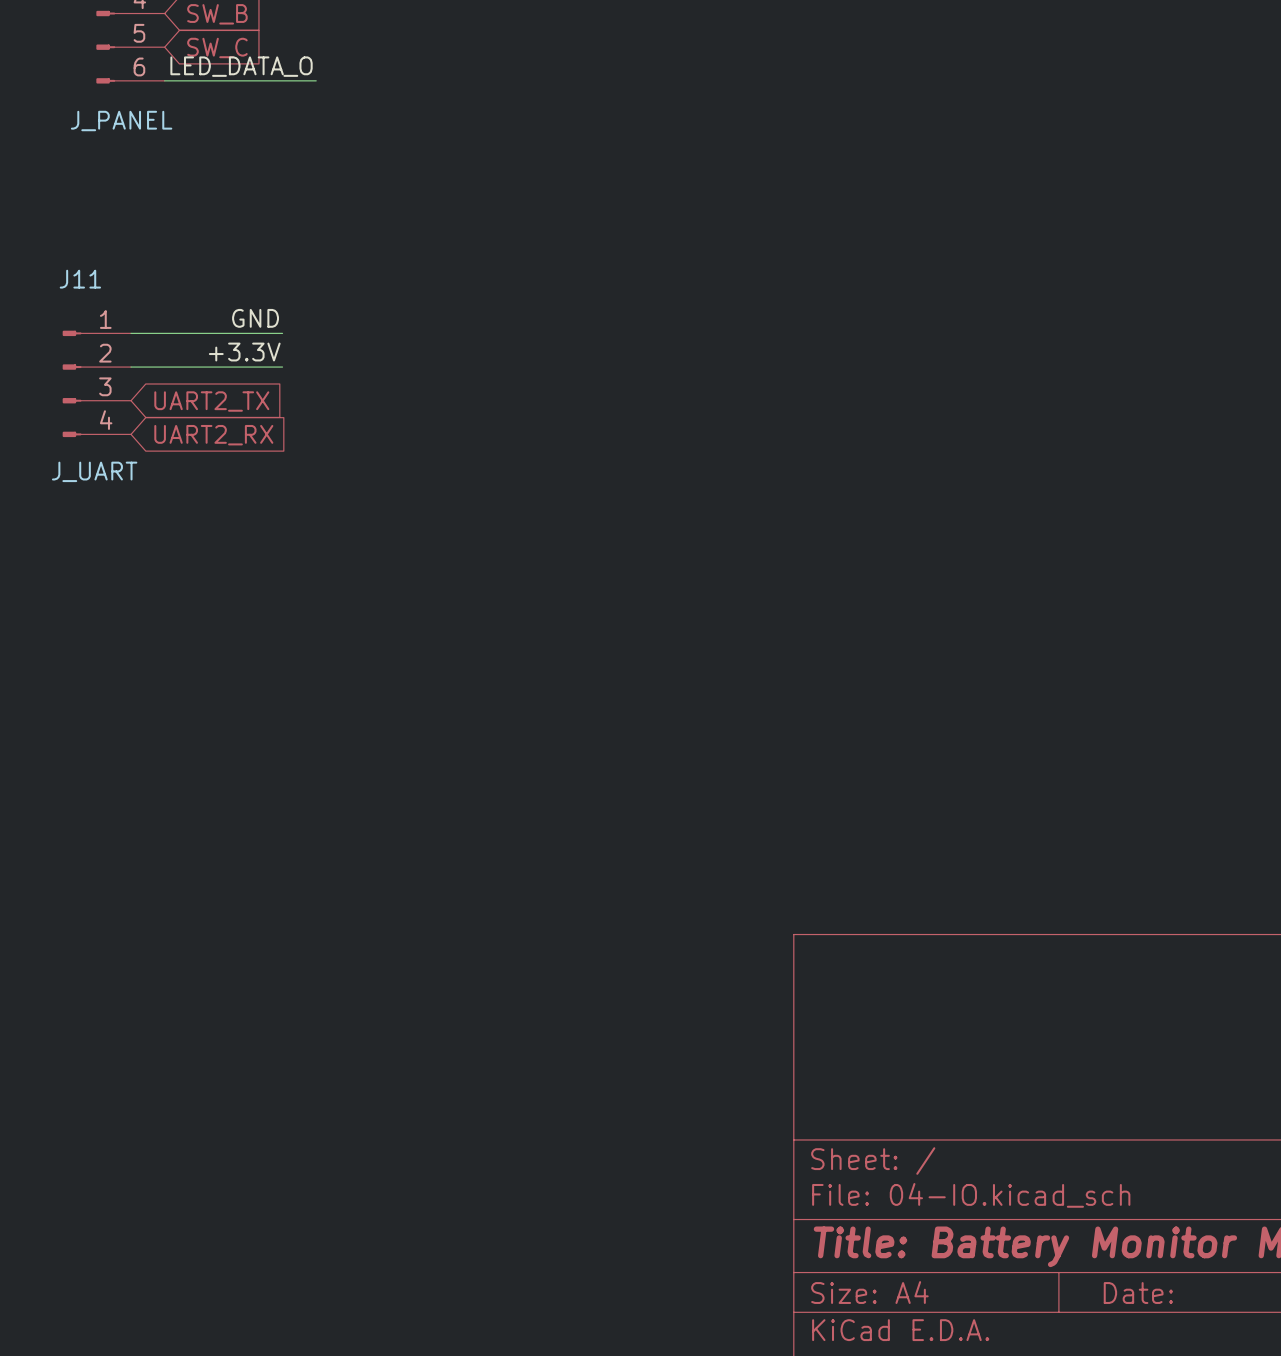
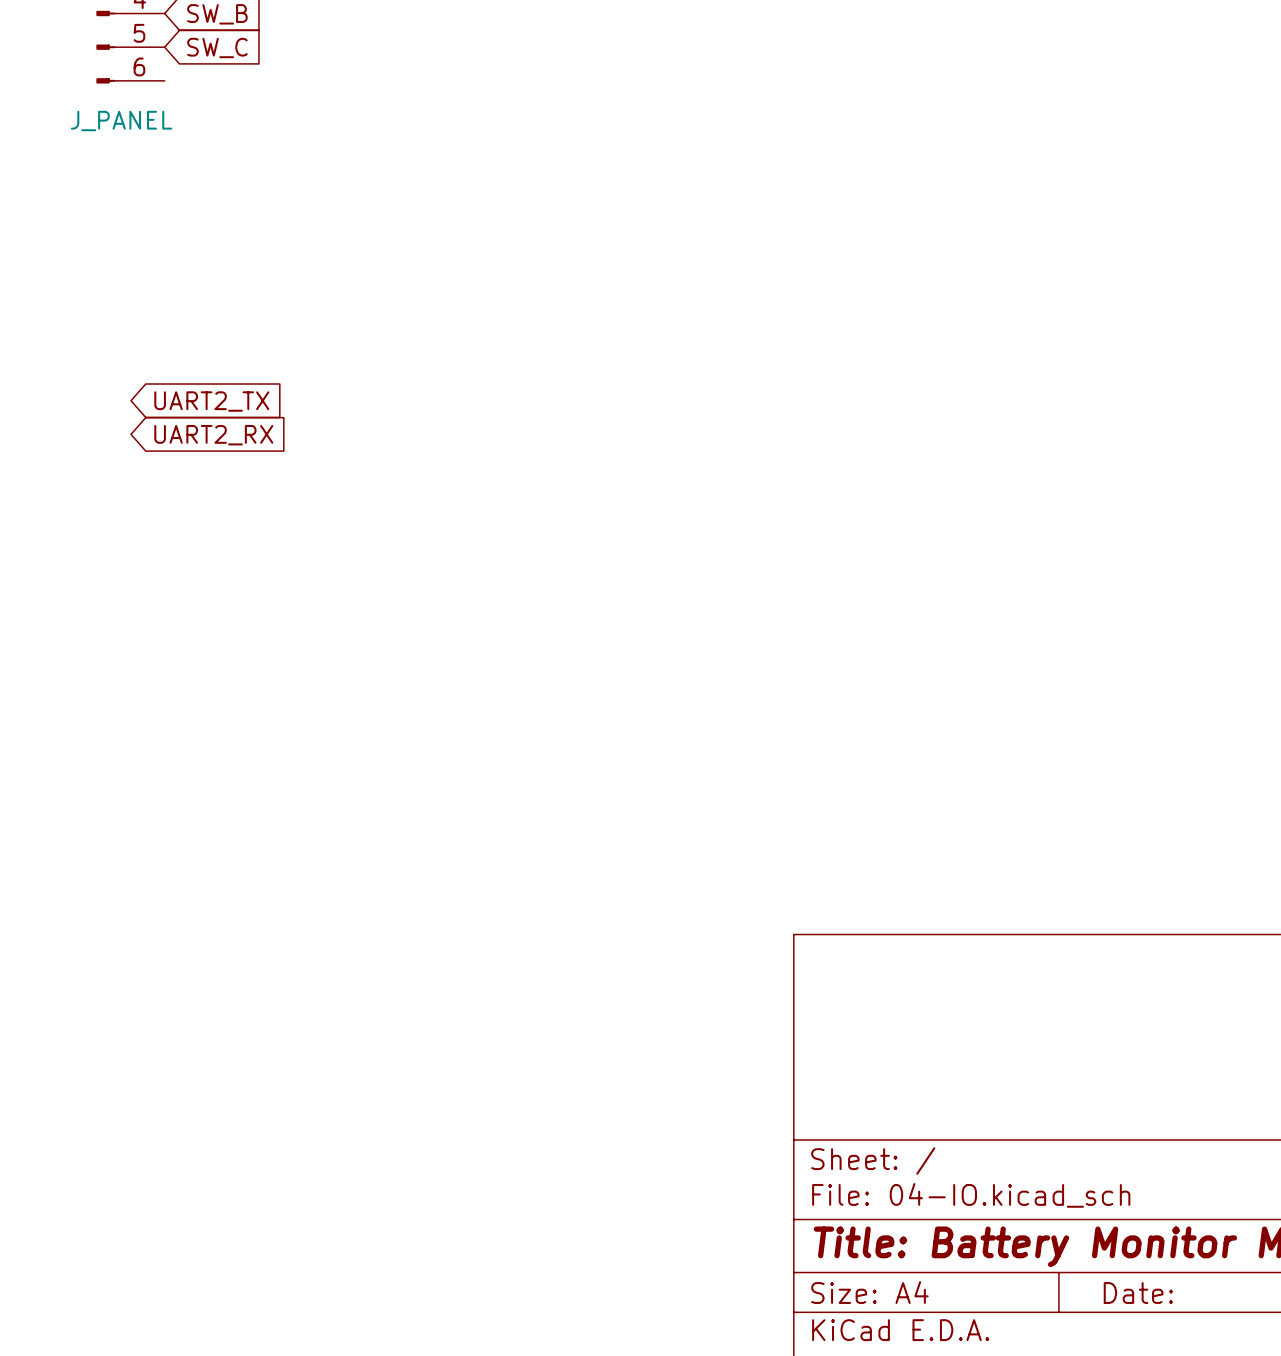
label: LED_DATA_O (241, 66) -> none
wire: (164, 80) (316, 80) -> none
label: GND (255, 318) -> none
wire: (131, 333) (282, 333) -> none
label: +3.3V (244, 352) -> none
wire: (131, 367) (282, 367) -> none
J11: J_UART (96, 383) -> none

